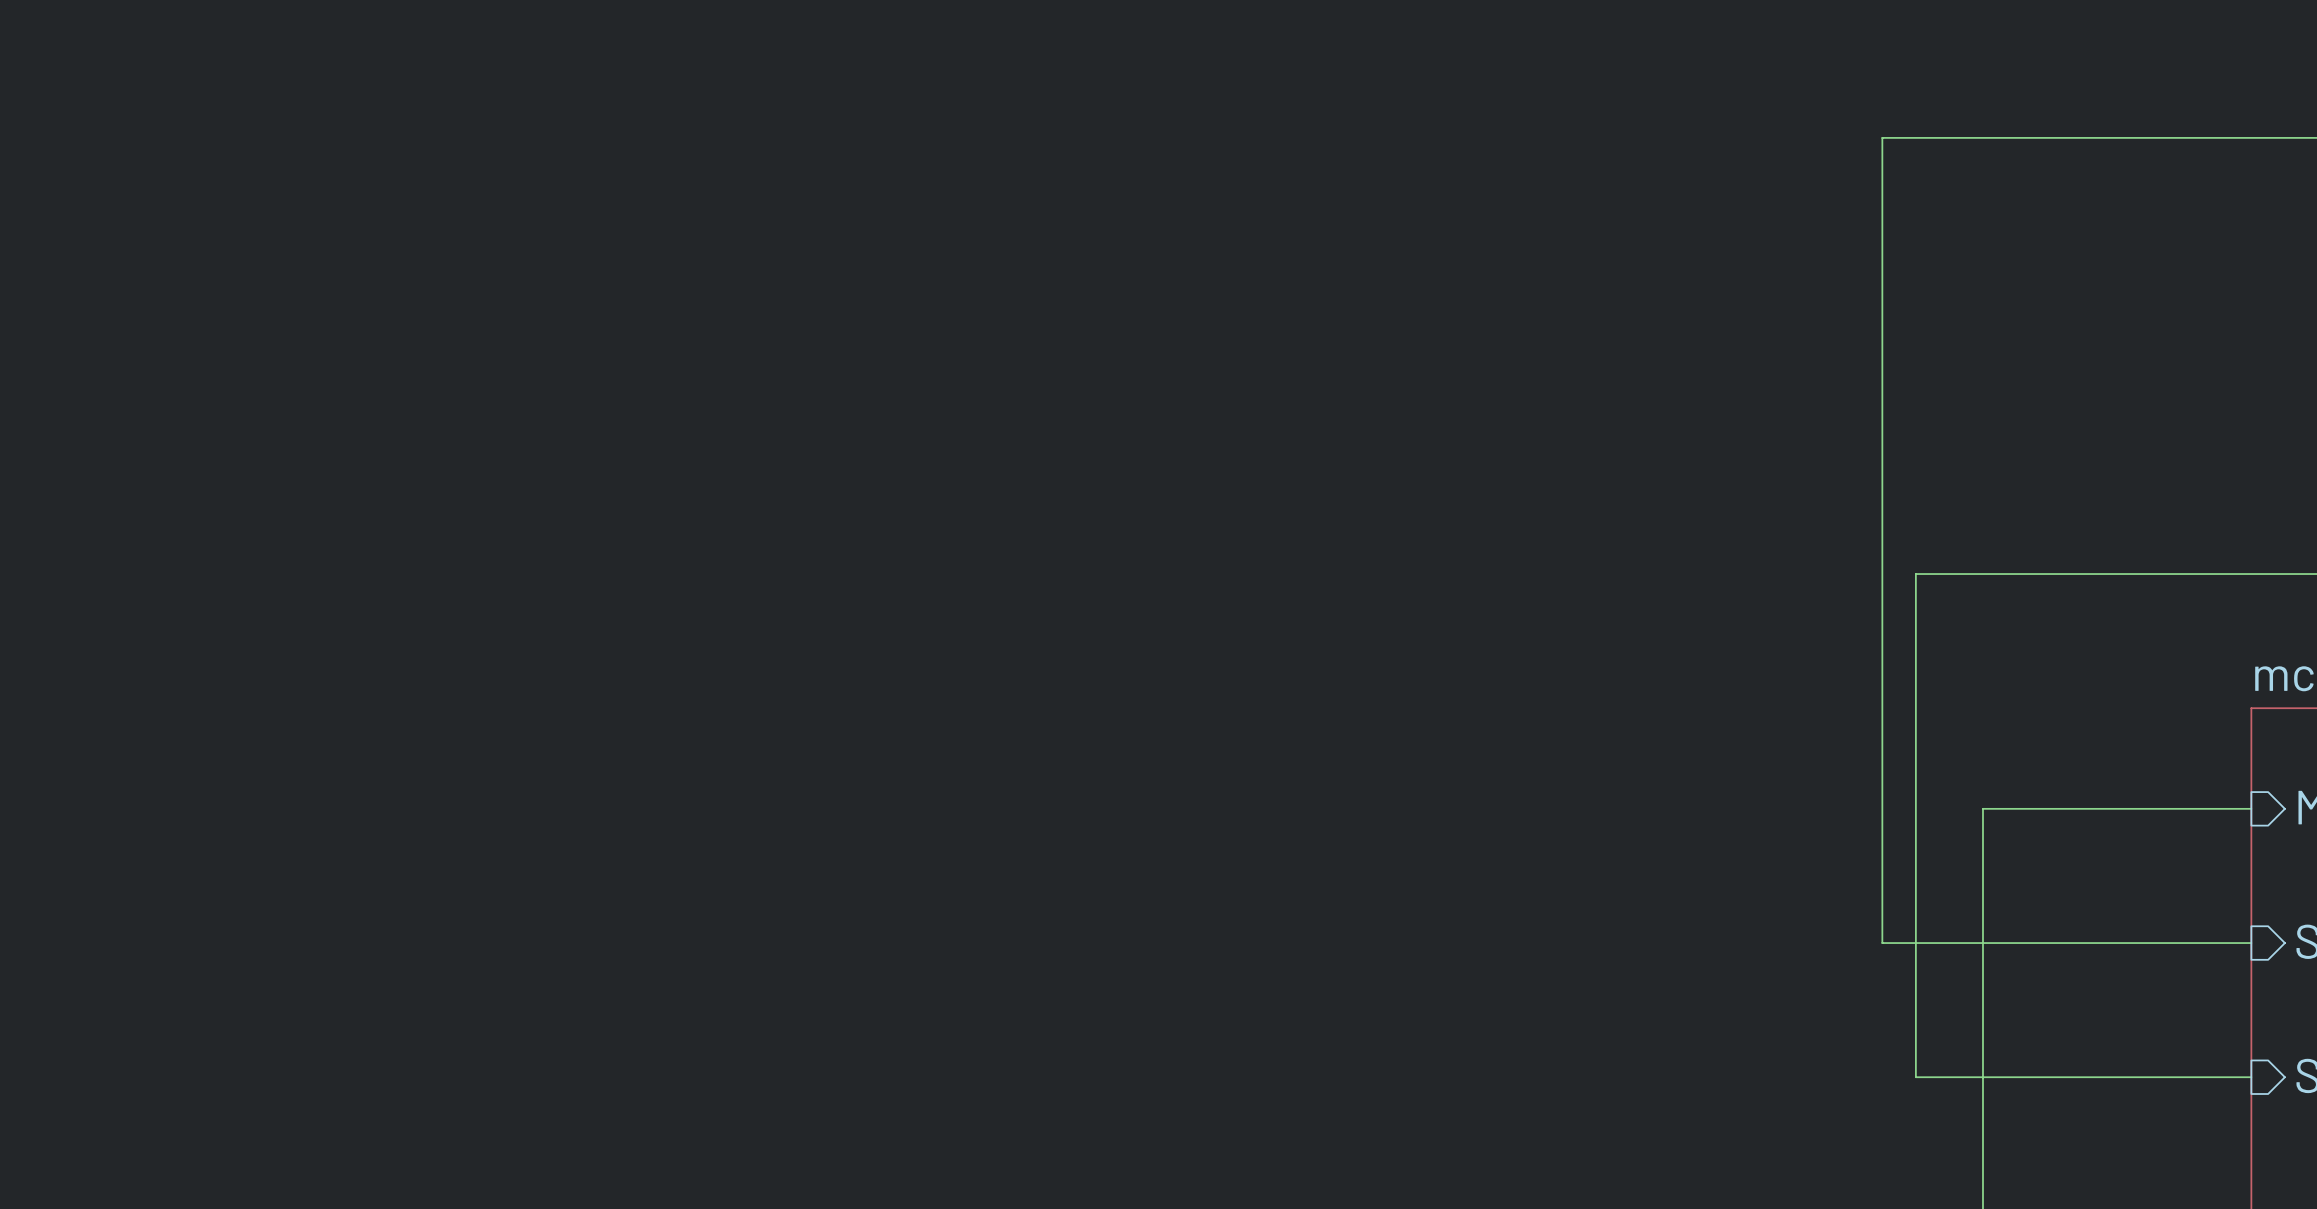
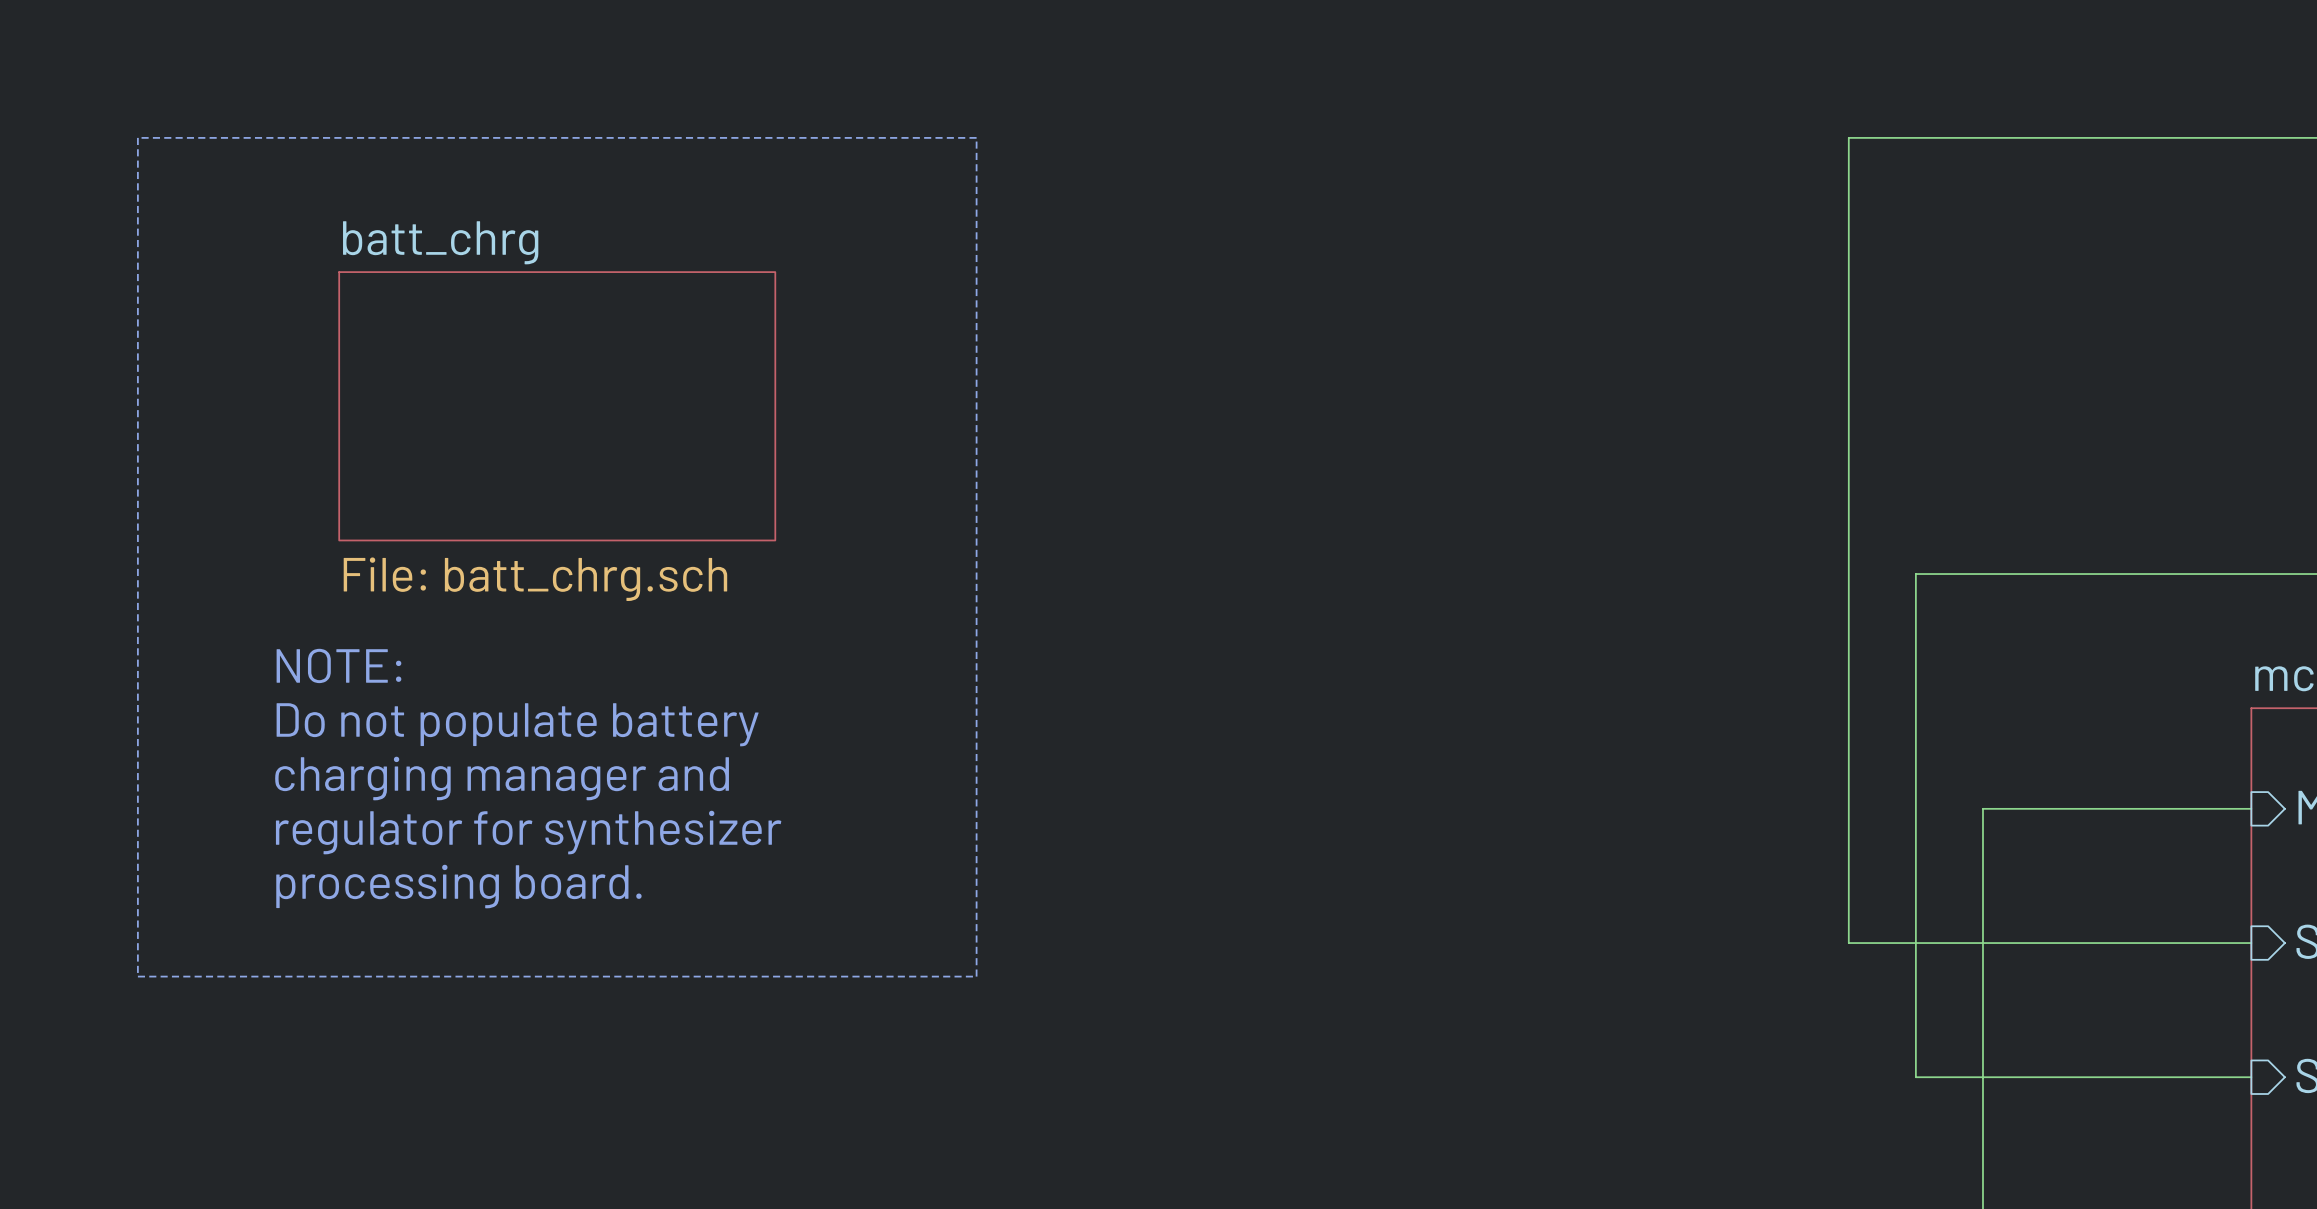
line: none -> (137, 137) (137, 976) (976, 976) (976, 137) (137, 137)
wire: (1882, 137) (1882, 943) -> (1882, 137) (1848, 137) (1848, 943) (1882, 943)
sheet batt_chrg: none -> File: batt_chrg.sch (557, 406)
text: none -> NOTE: (338, 665)
text: none -> Do not populate battery (517, 724)
text: none -> charging manager and (502, 778)
text: none -> regulator for synthesizer (528, 832)
text: none -> processing board. (458, 886)

